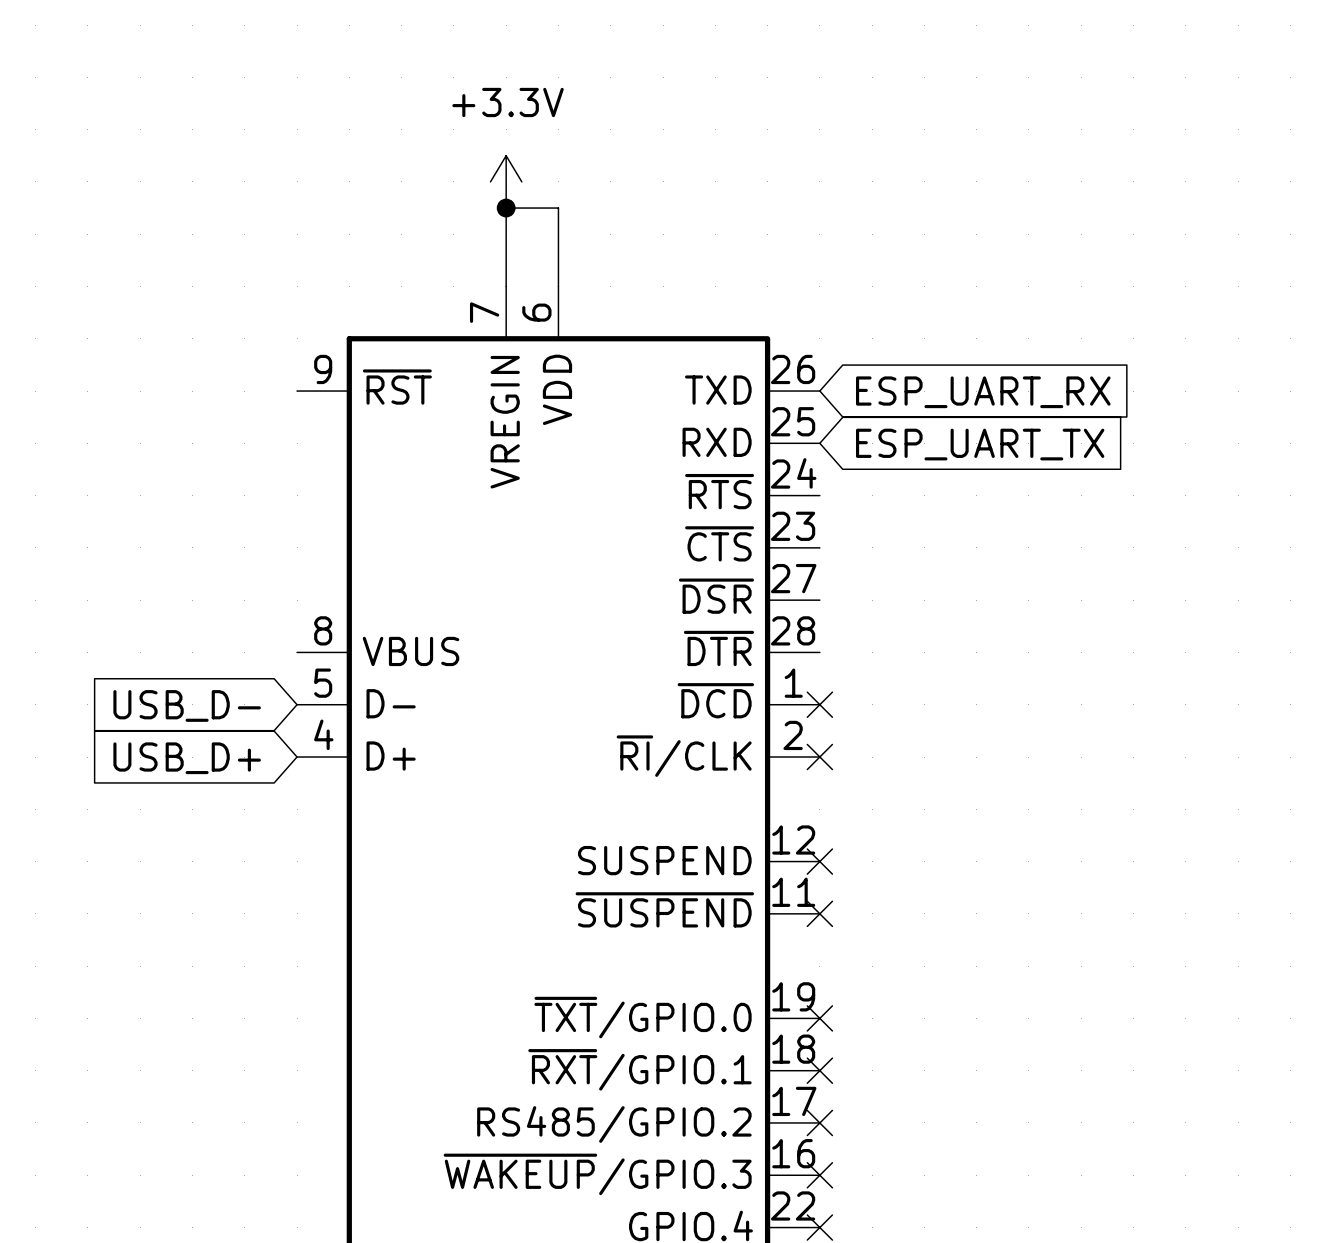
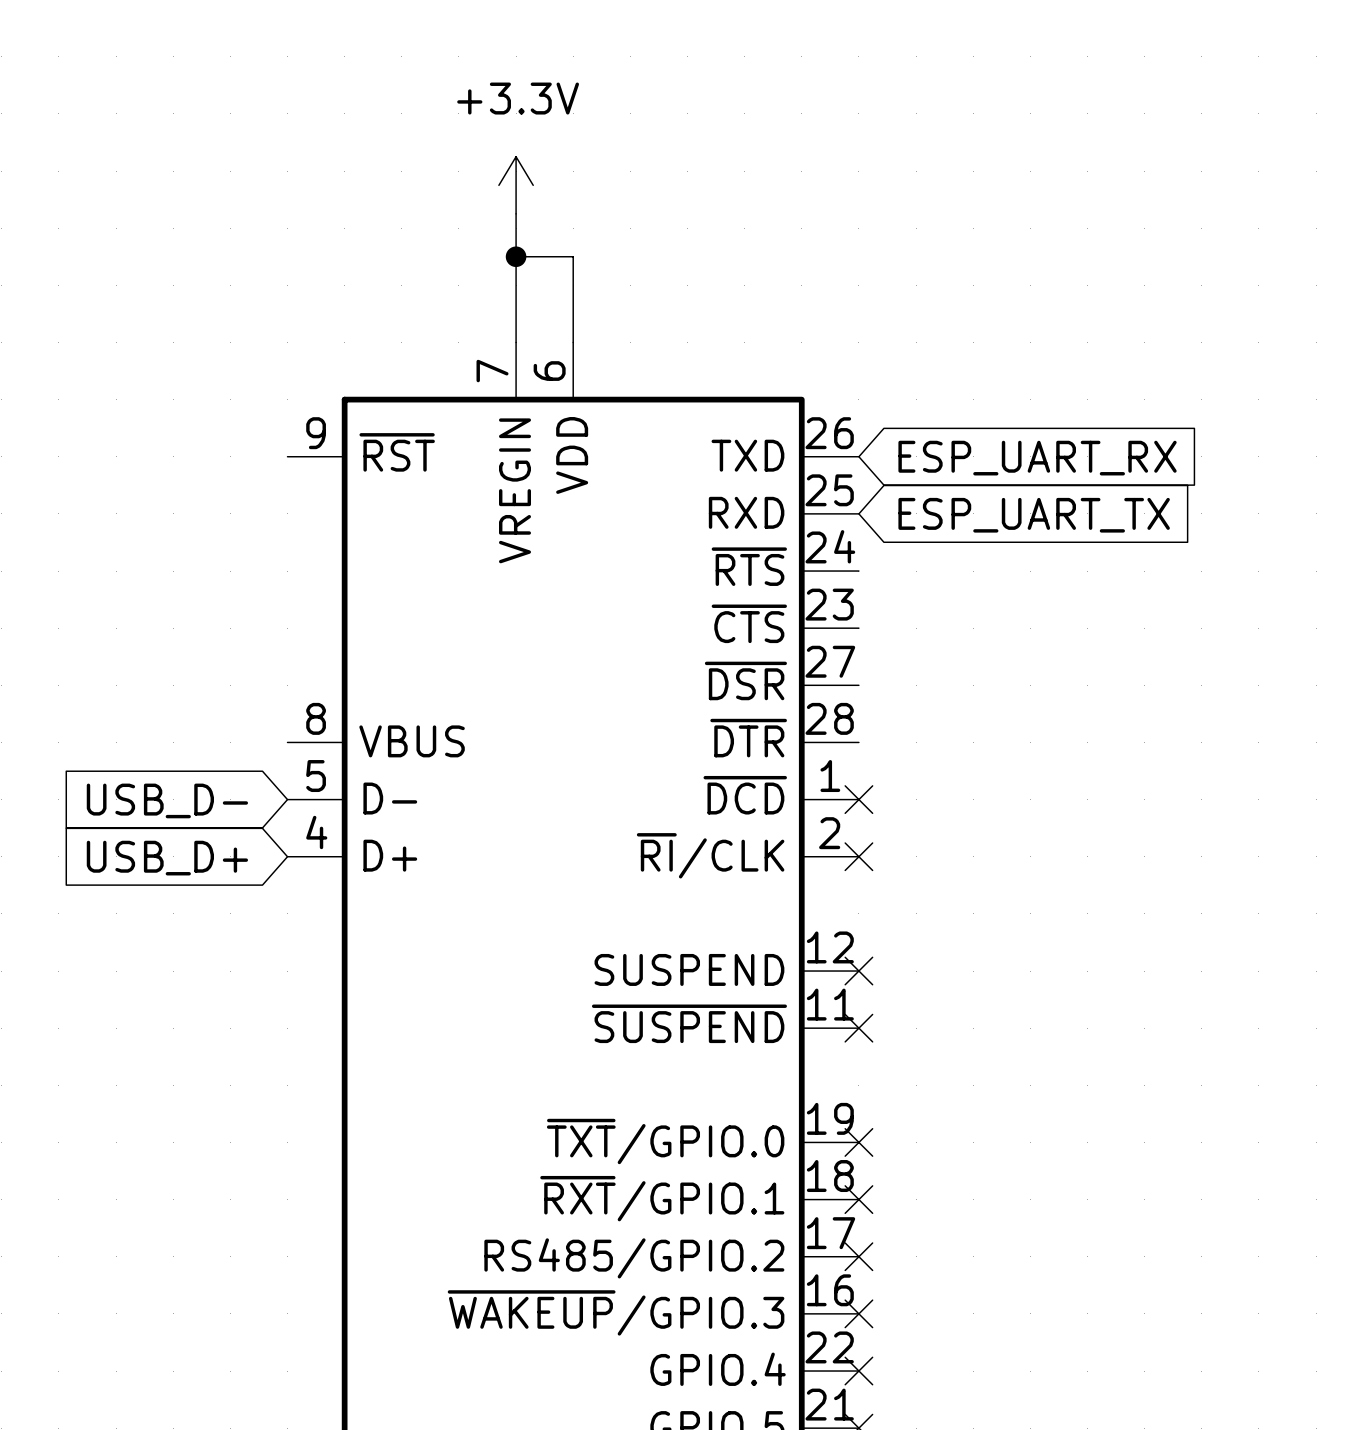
power symbol position: +3.3V (506, 181) -> +3.3V (516, 185)

